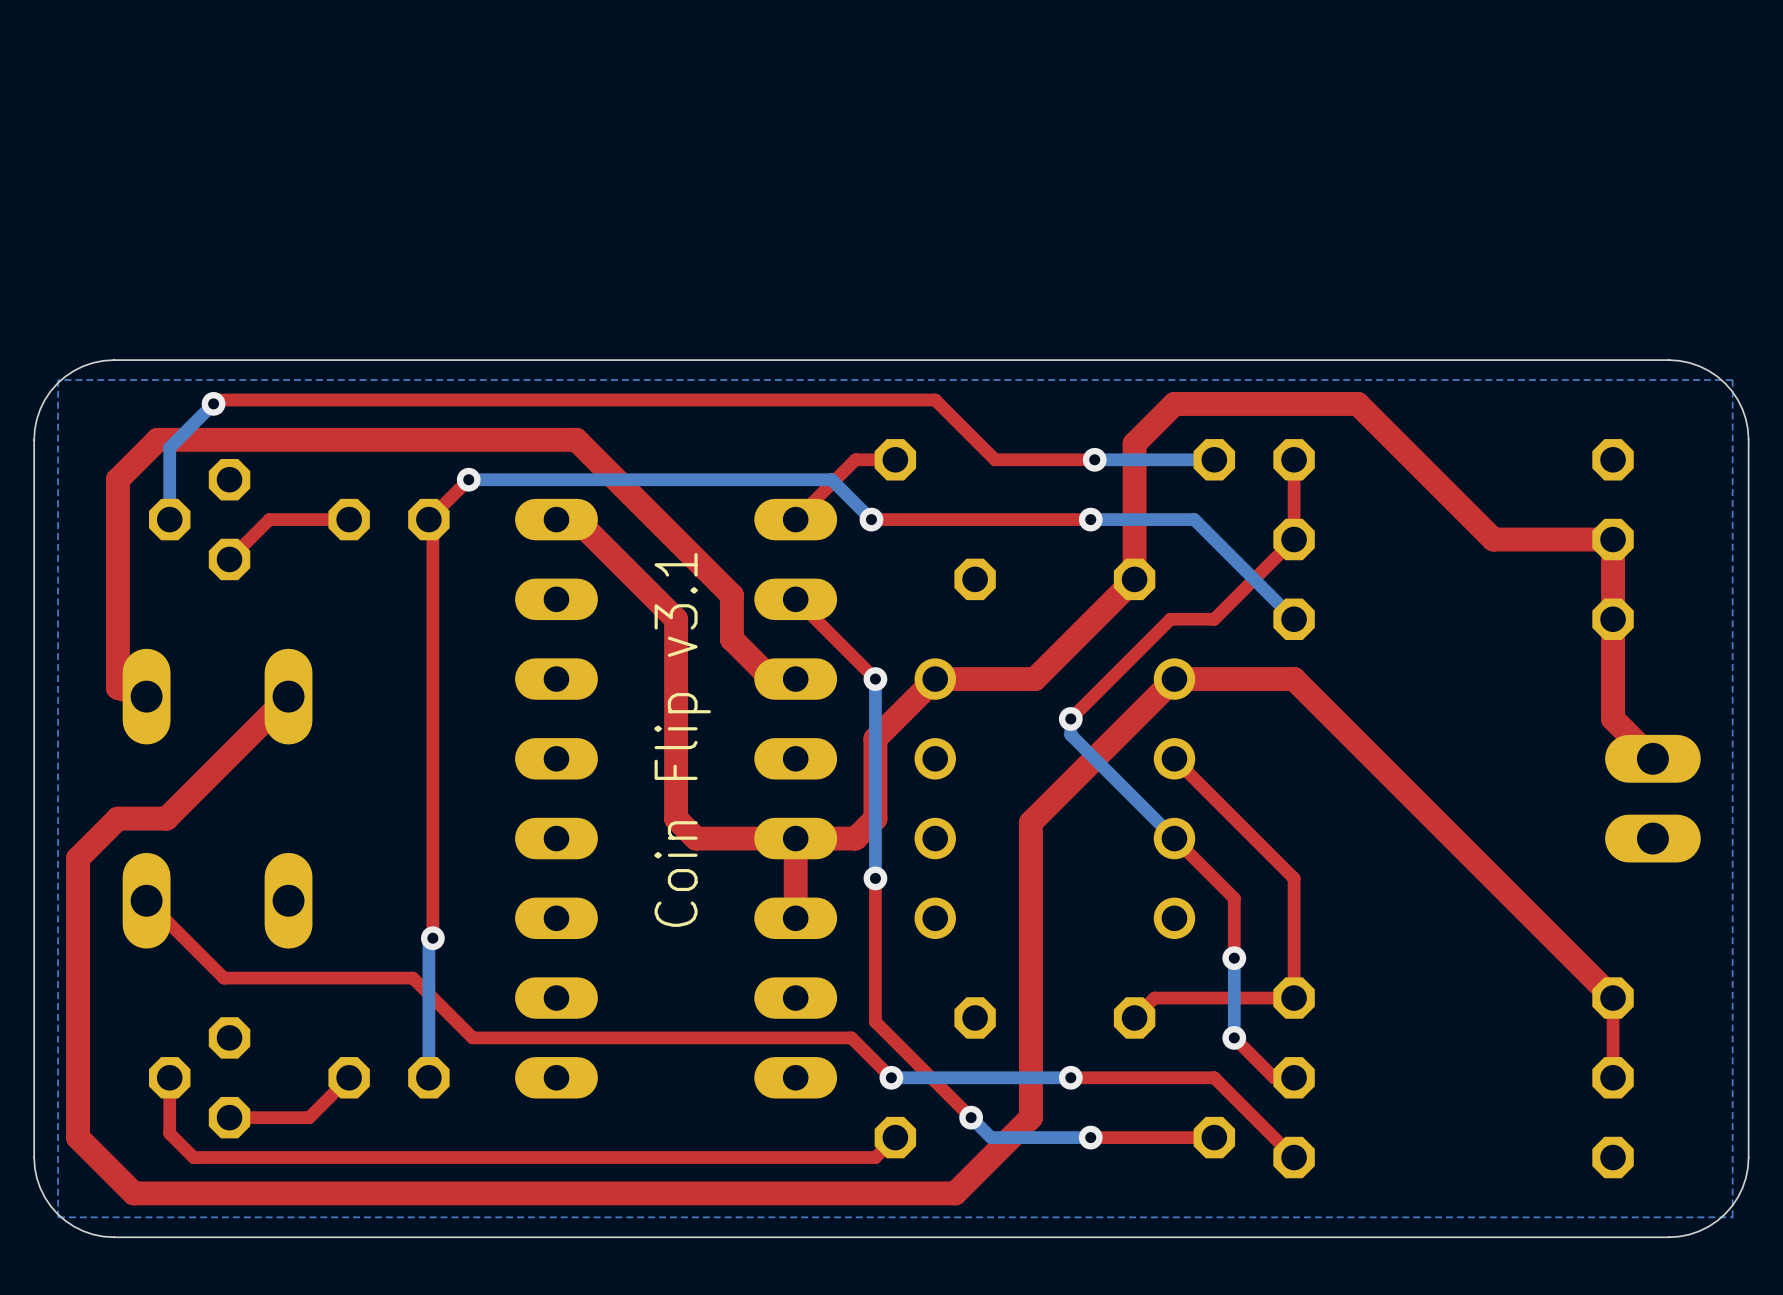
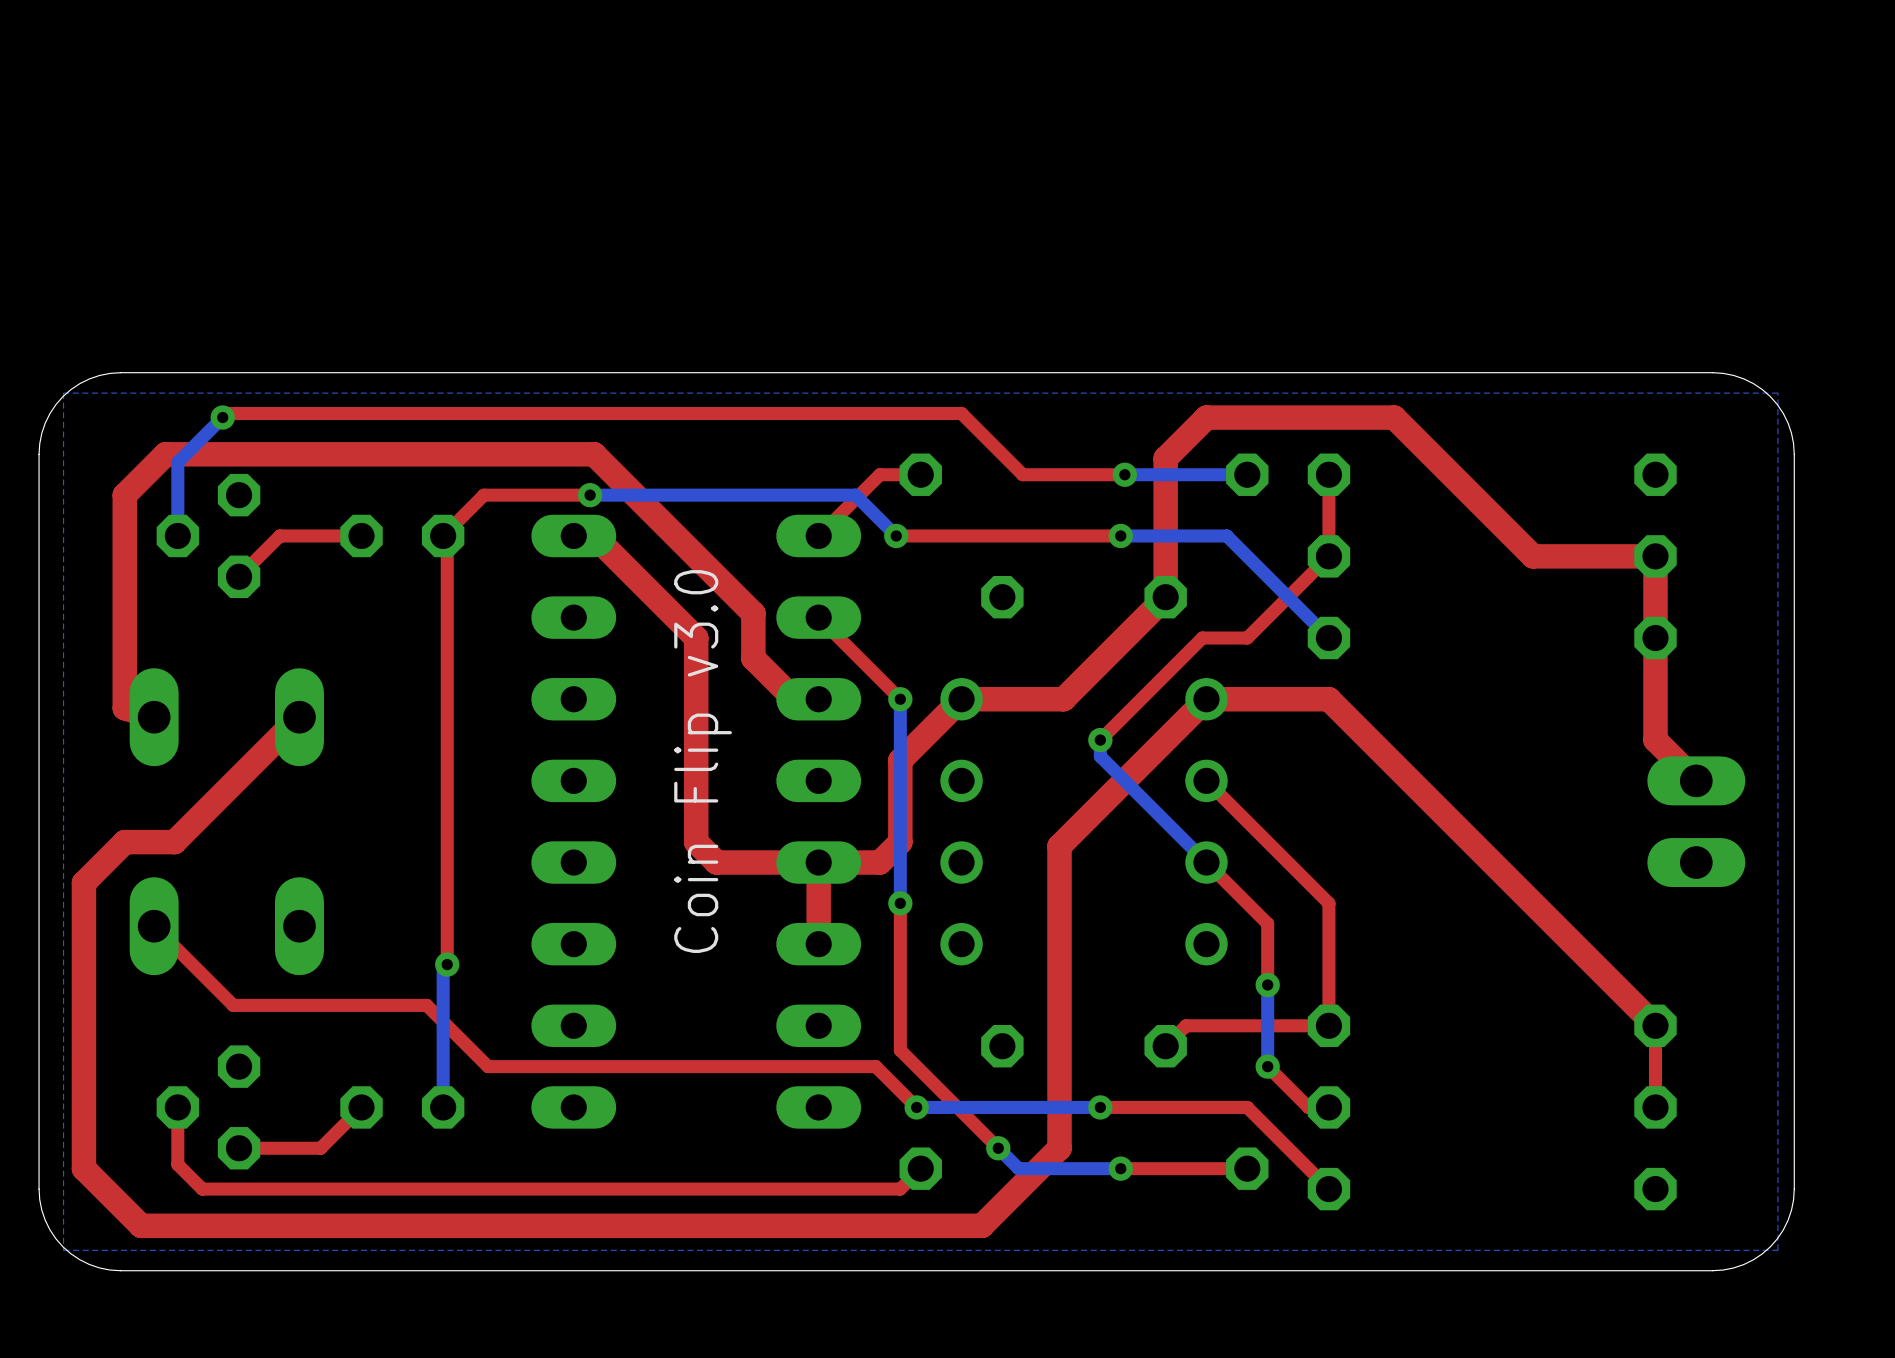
via position: (468, 479) -> (590, 495)
top track: none -> (590, 495) (483, 495)
bottom track: (572, 479) (468, 479) -> none
text: Coin Flip v3.1 (682, 739) -> Coin Flip v3.0 (703, 761)

